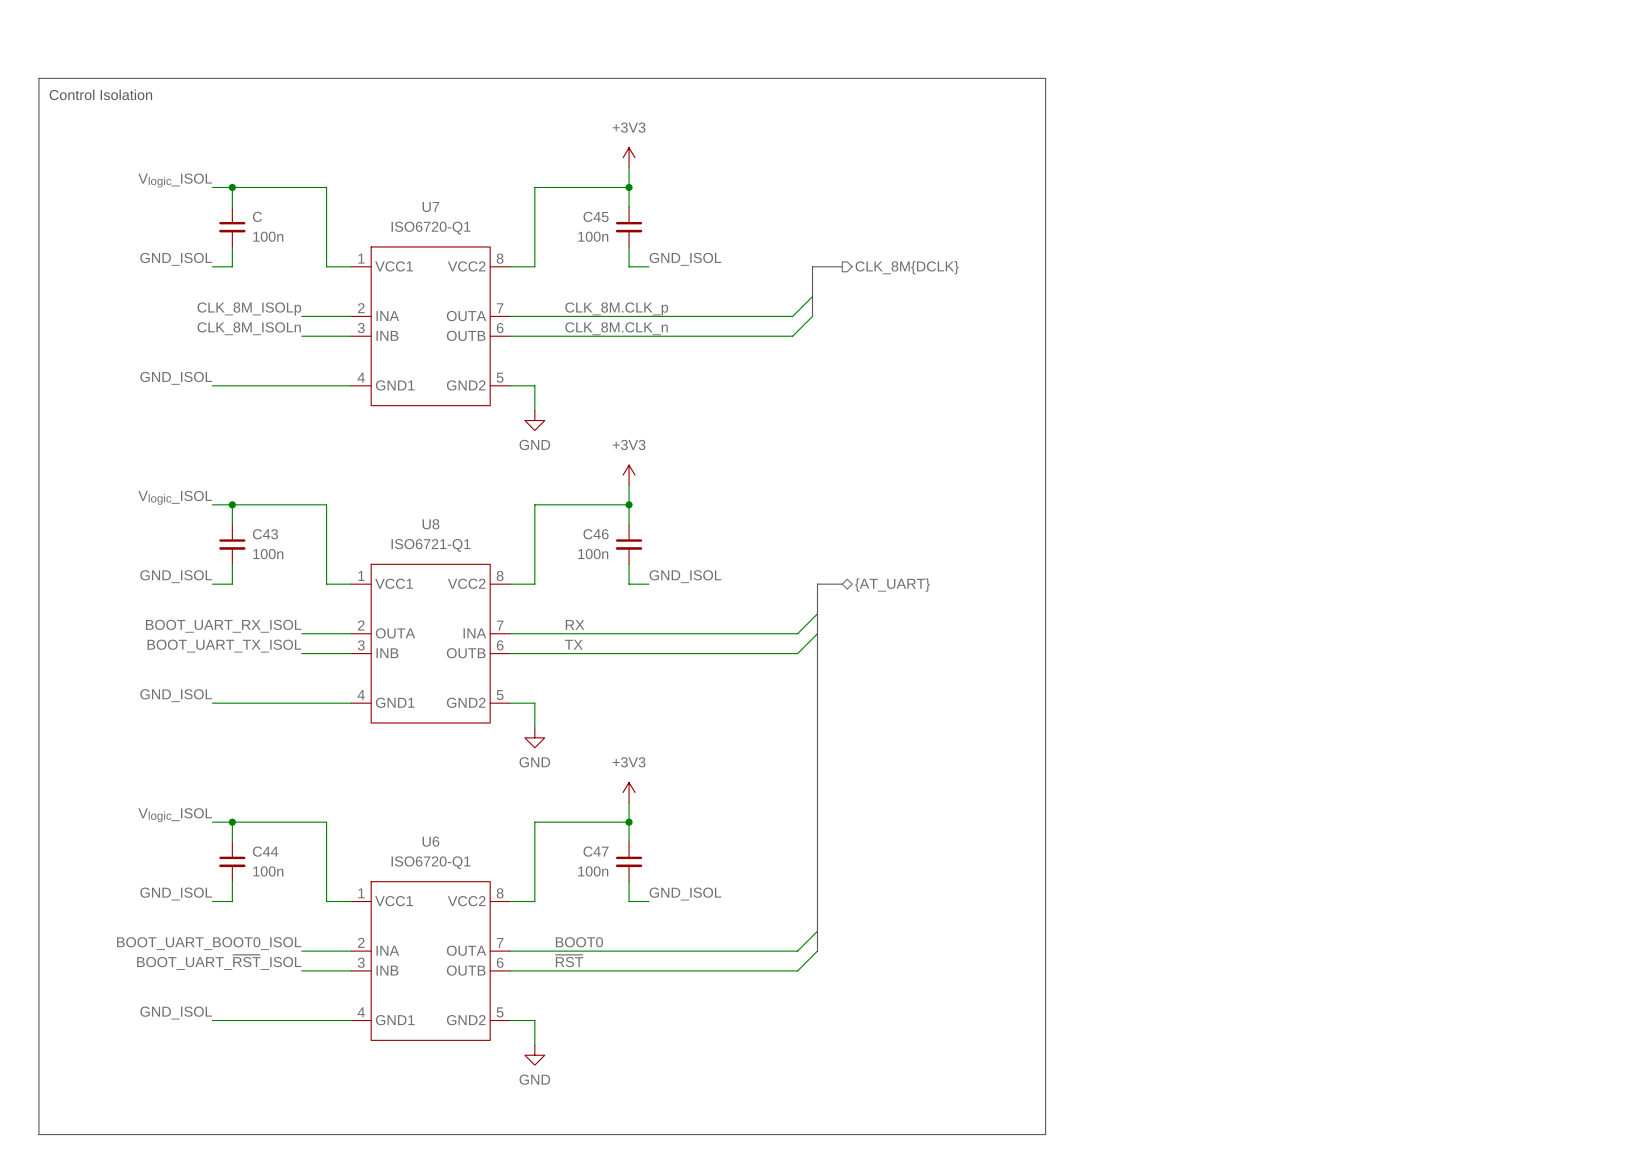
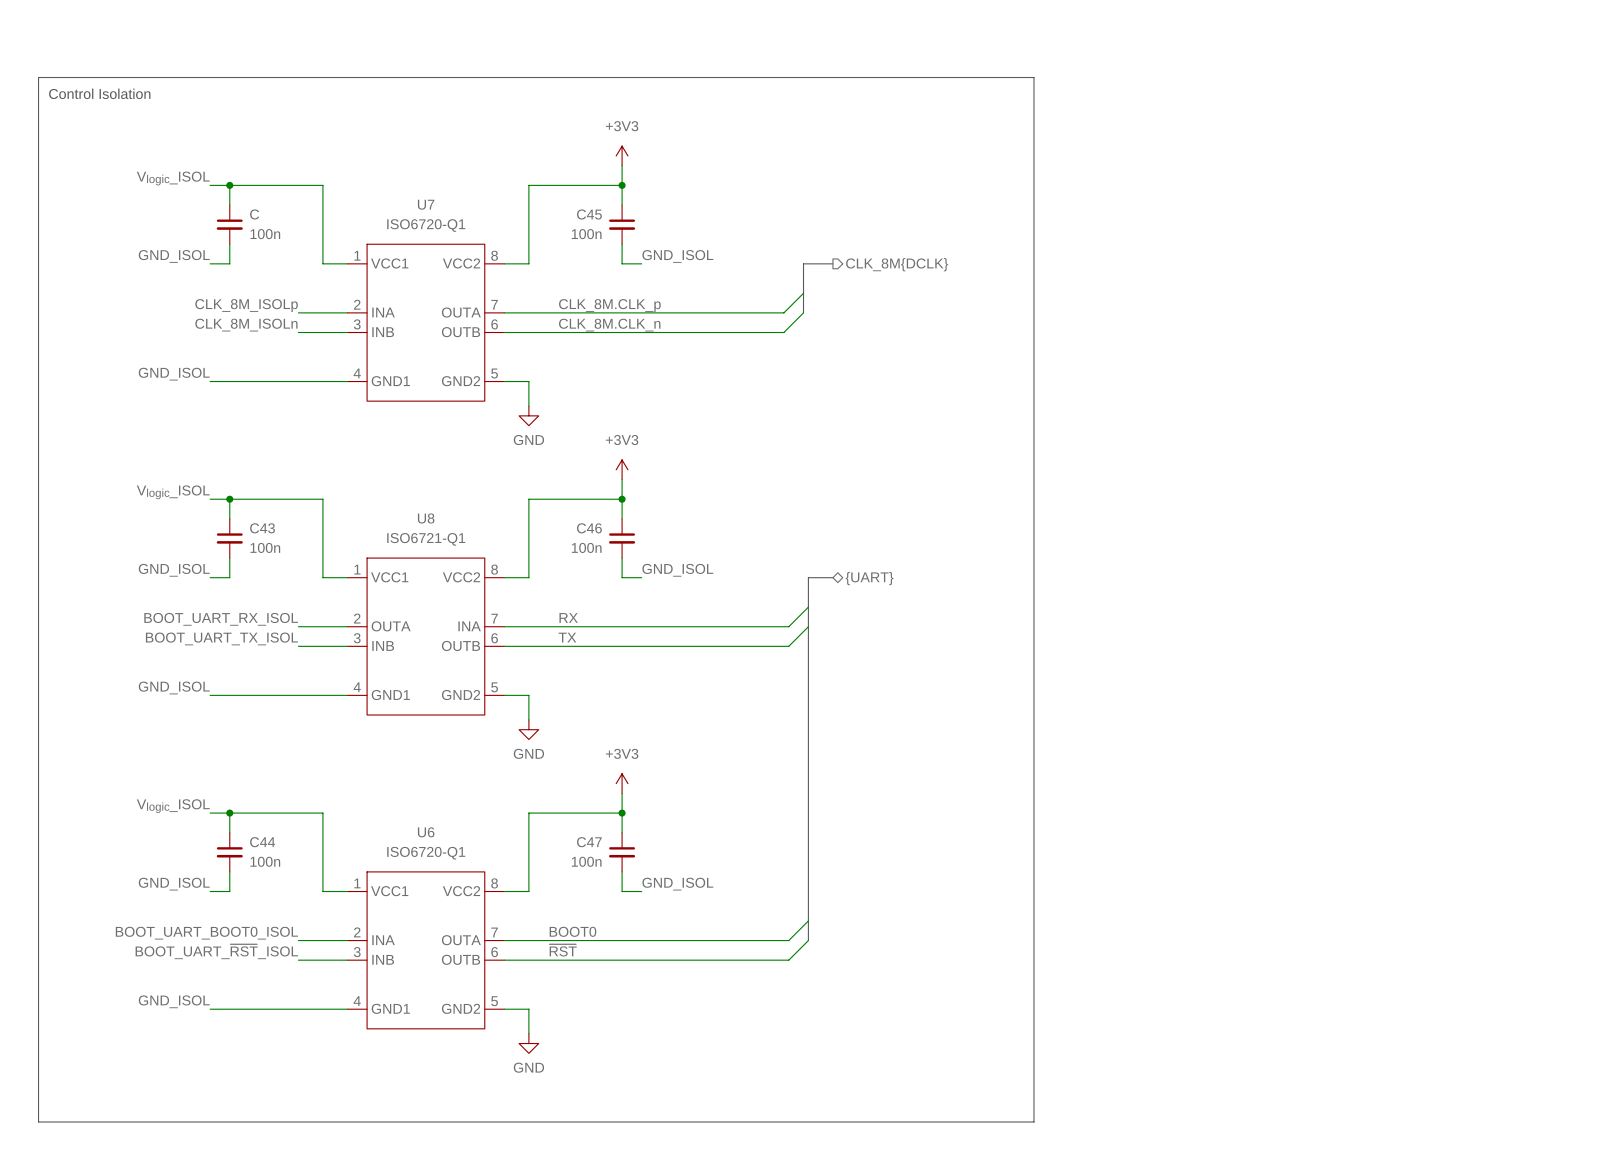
hierarchical label: {AT_UART} (892, 585) -> {UART} (869, 578)

